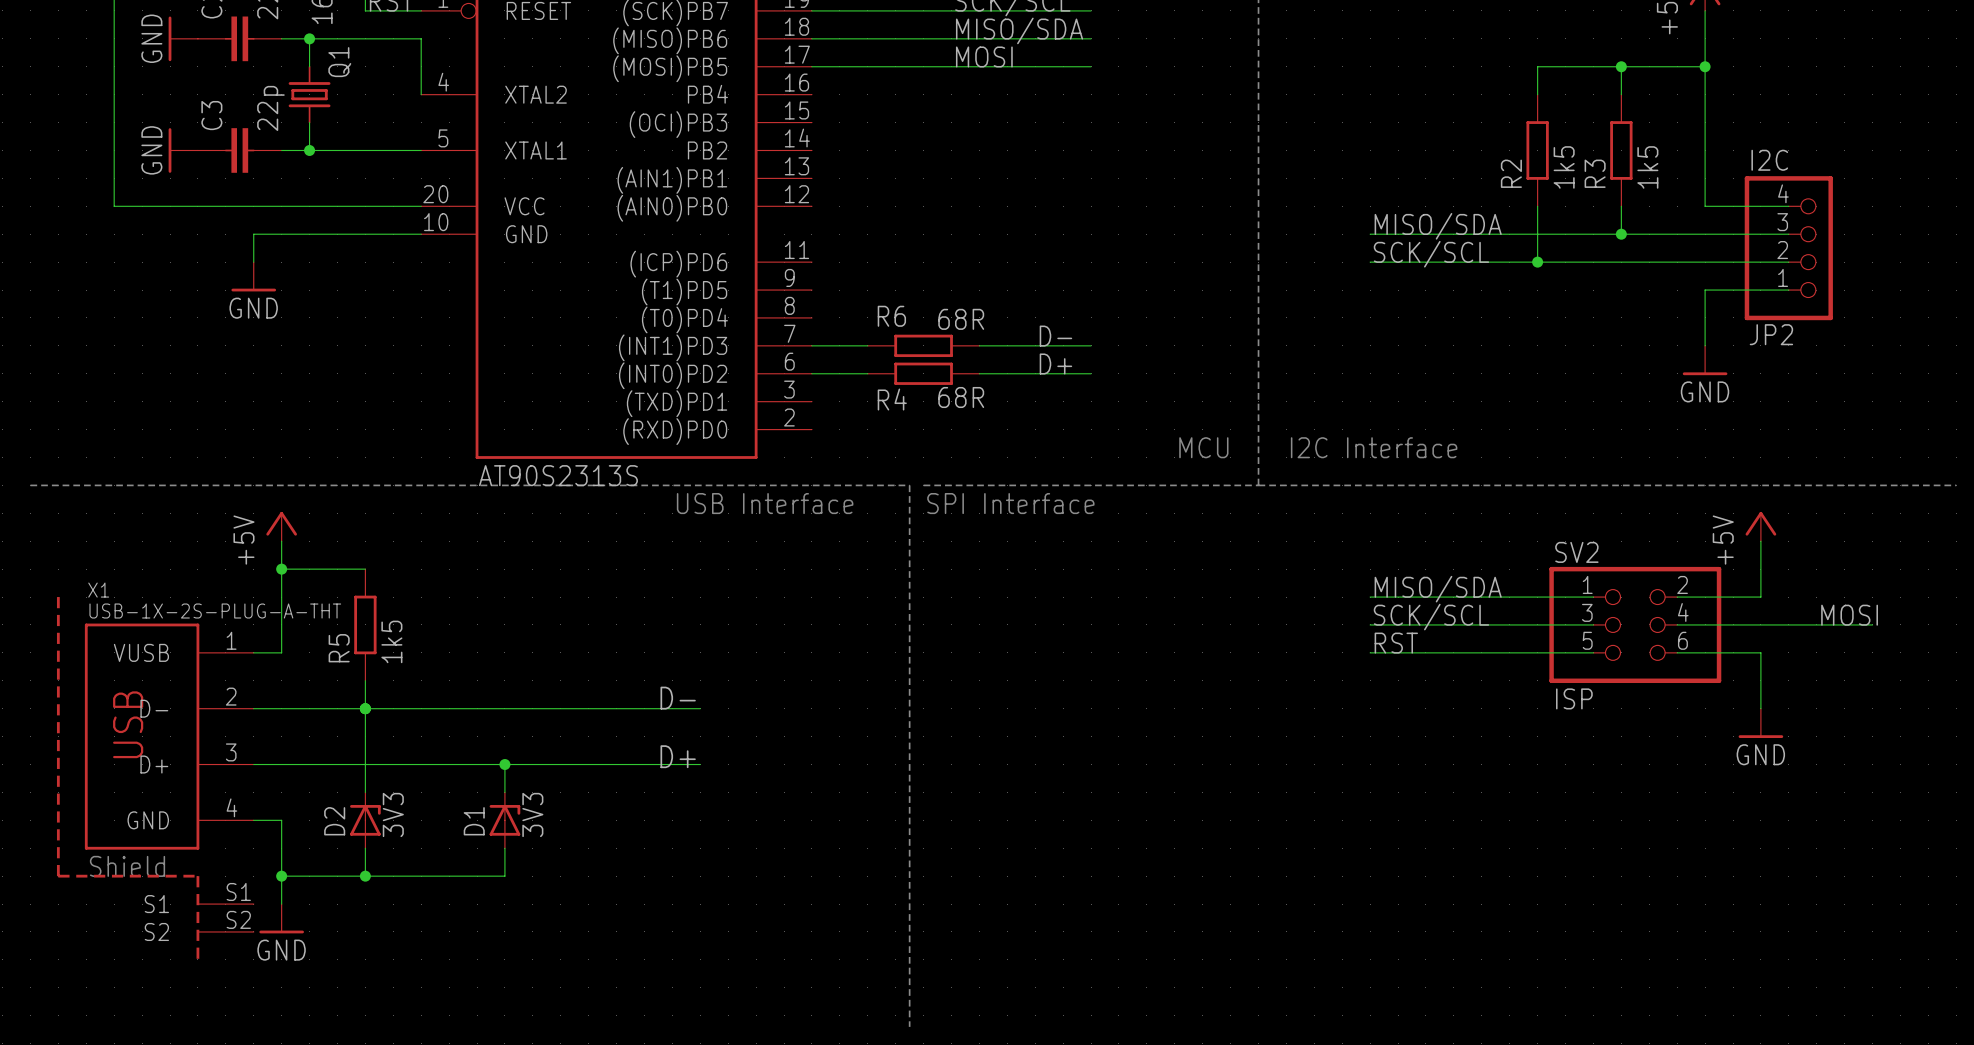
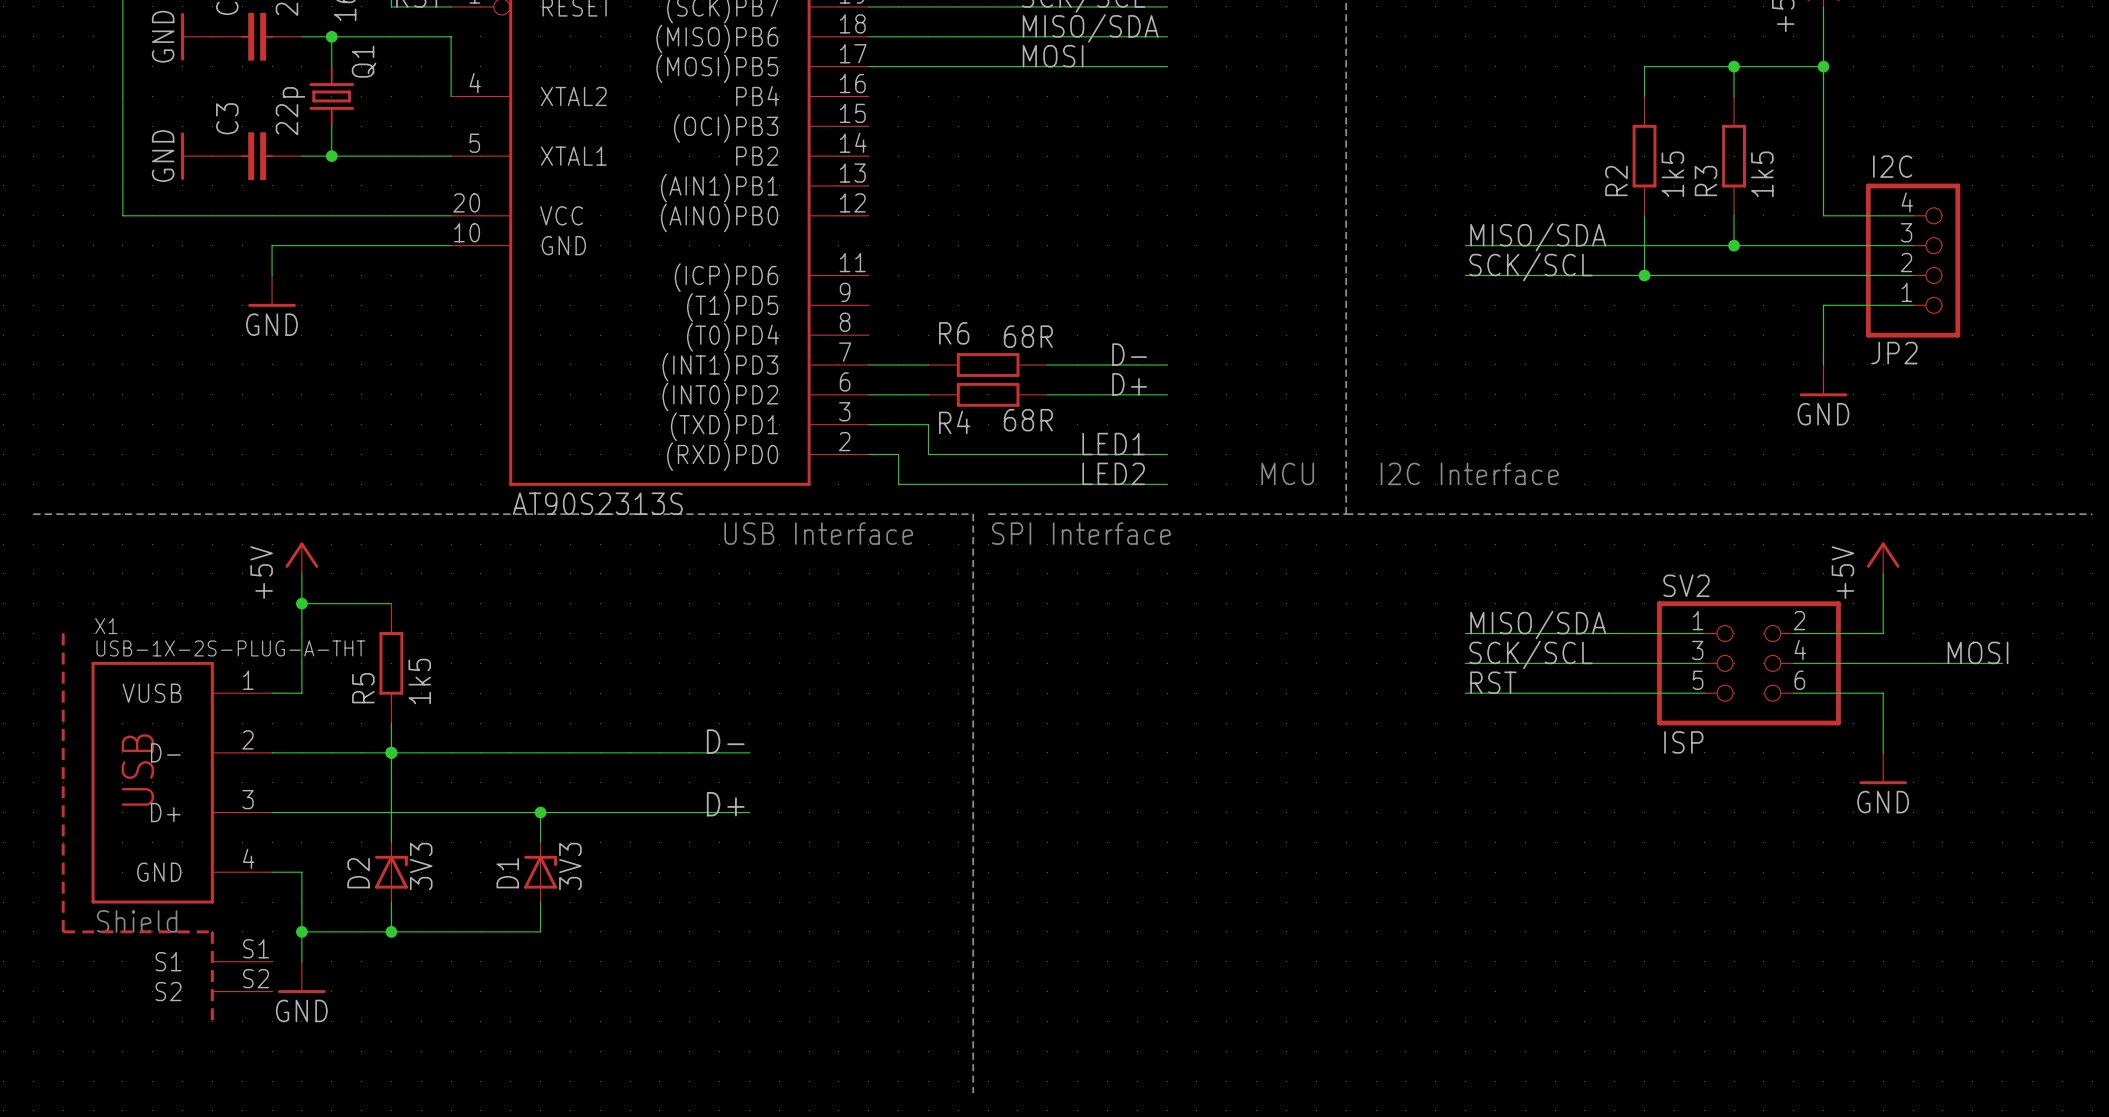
wire: none -> (868, 424) (928, 424) (928, 454) (1167, 454)
label: none -> LED1 (1113, 444)
wire: none -> (868, 454) (898, 454) (898, 484) (1167, 484)
label: none -> LED2 (1113, 473)

